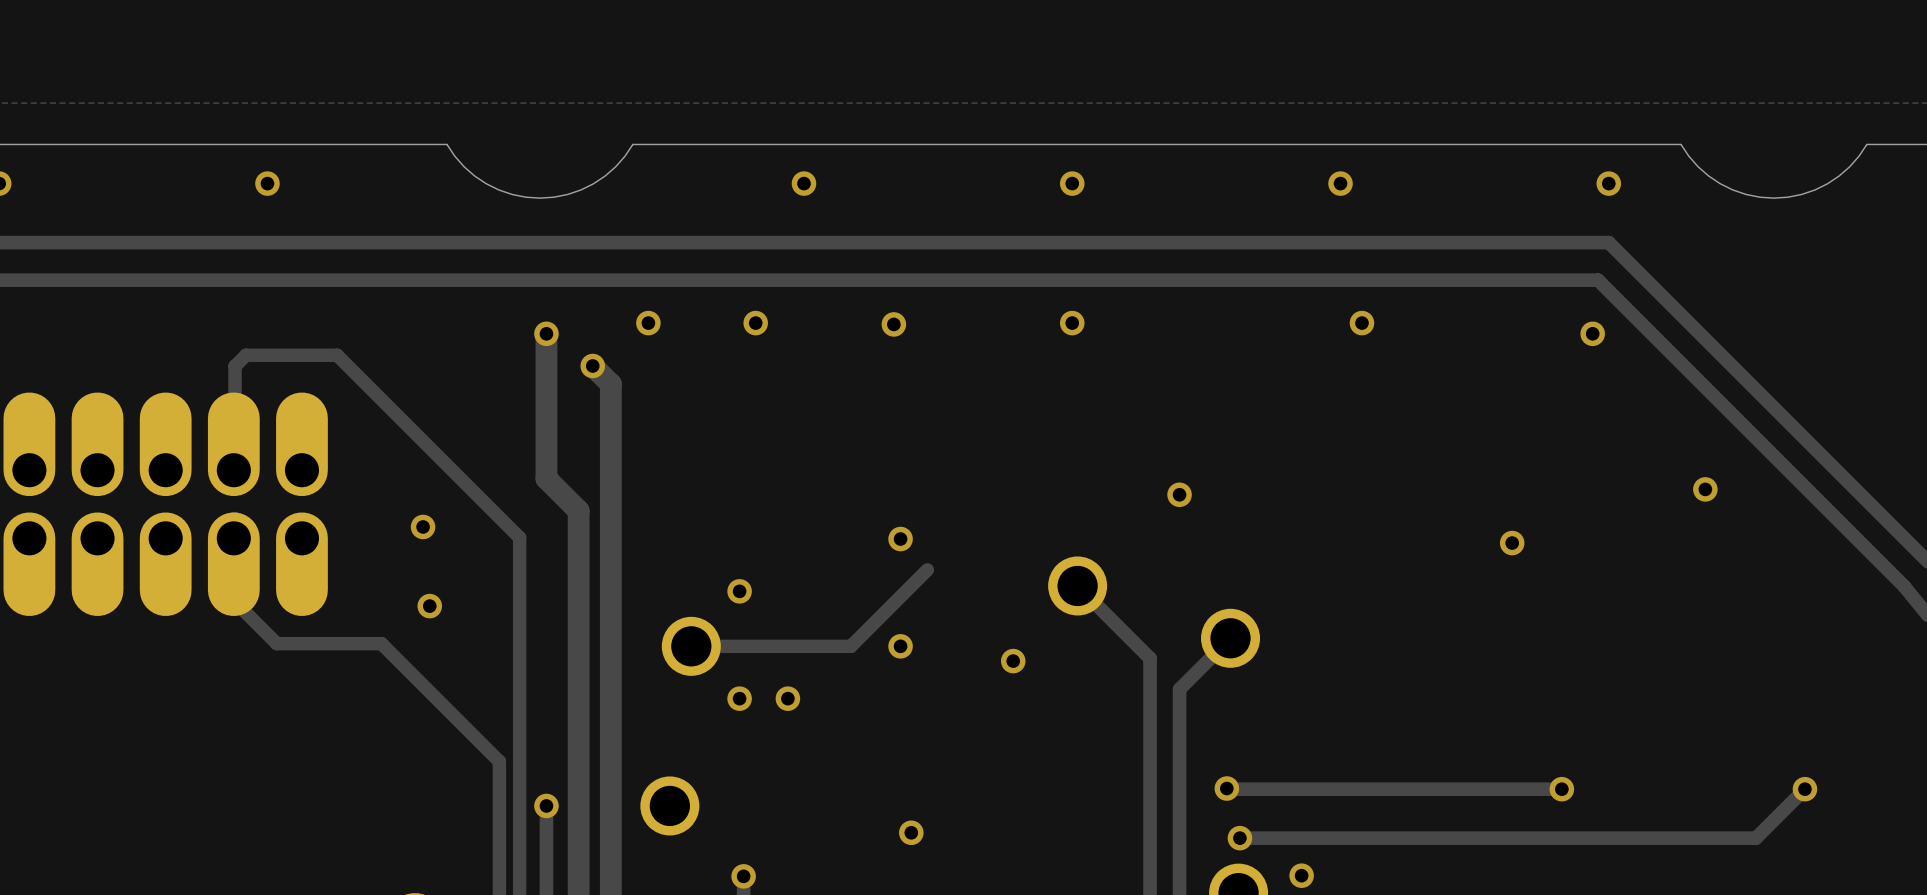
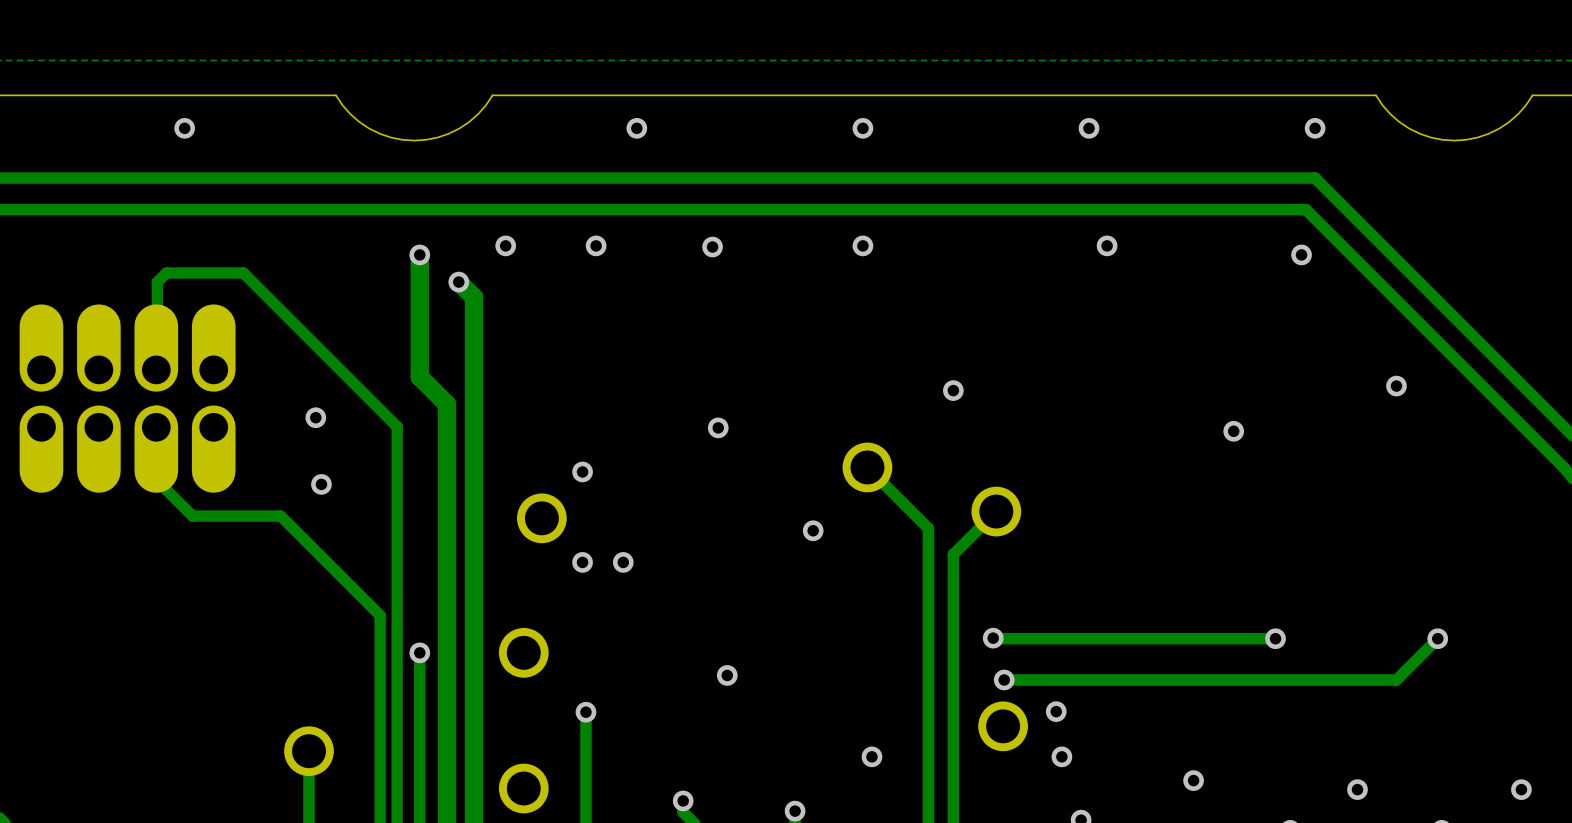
track: (927, 569) (850, 646) (691, 646) -> none
via: (900, 646) -> none
track: (1804, 789) (1755, 838) (1705, 838) -> (1437, 638) (1396, 679)
via position: (1804, 789) -> (1437, 638)

